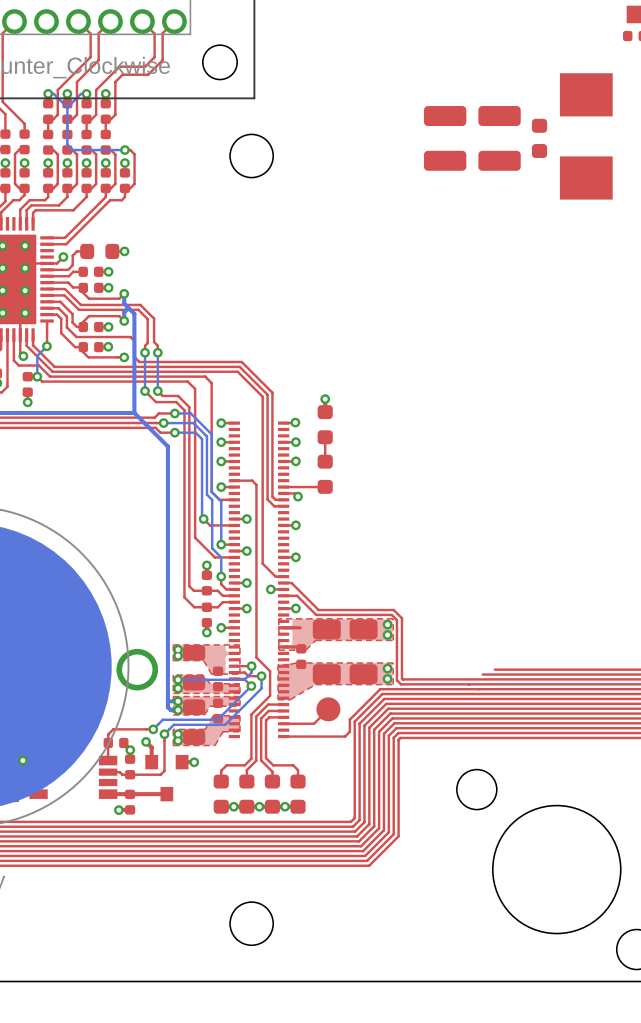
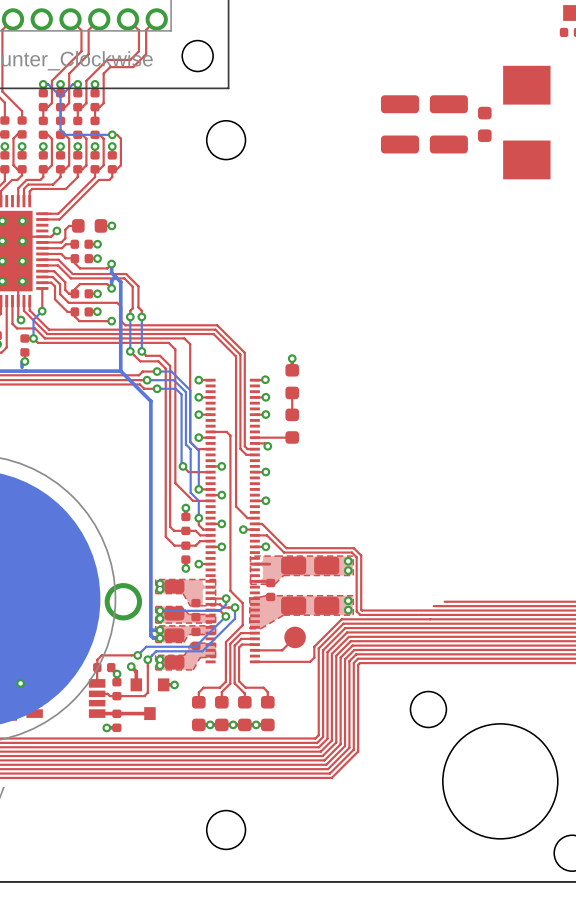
bottom track: none -> (22, 361) (22, 367)

